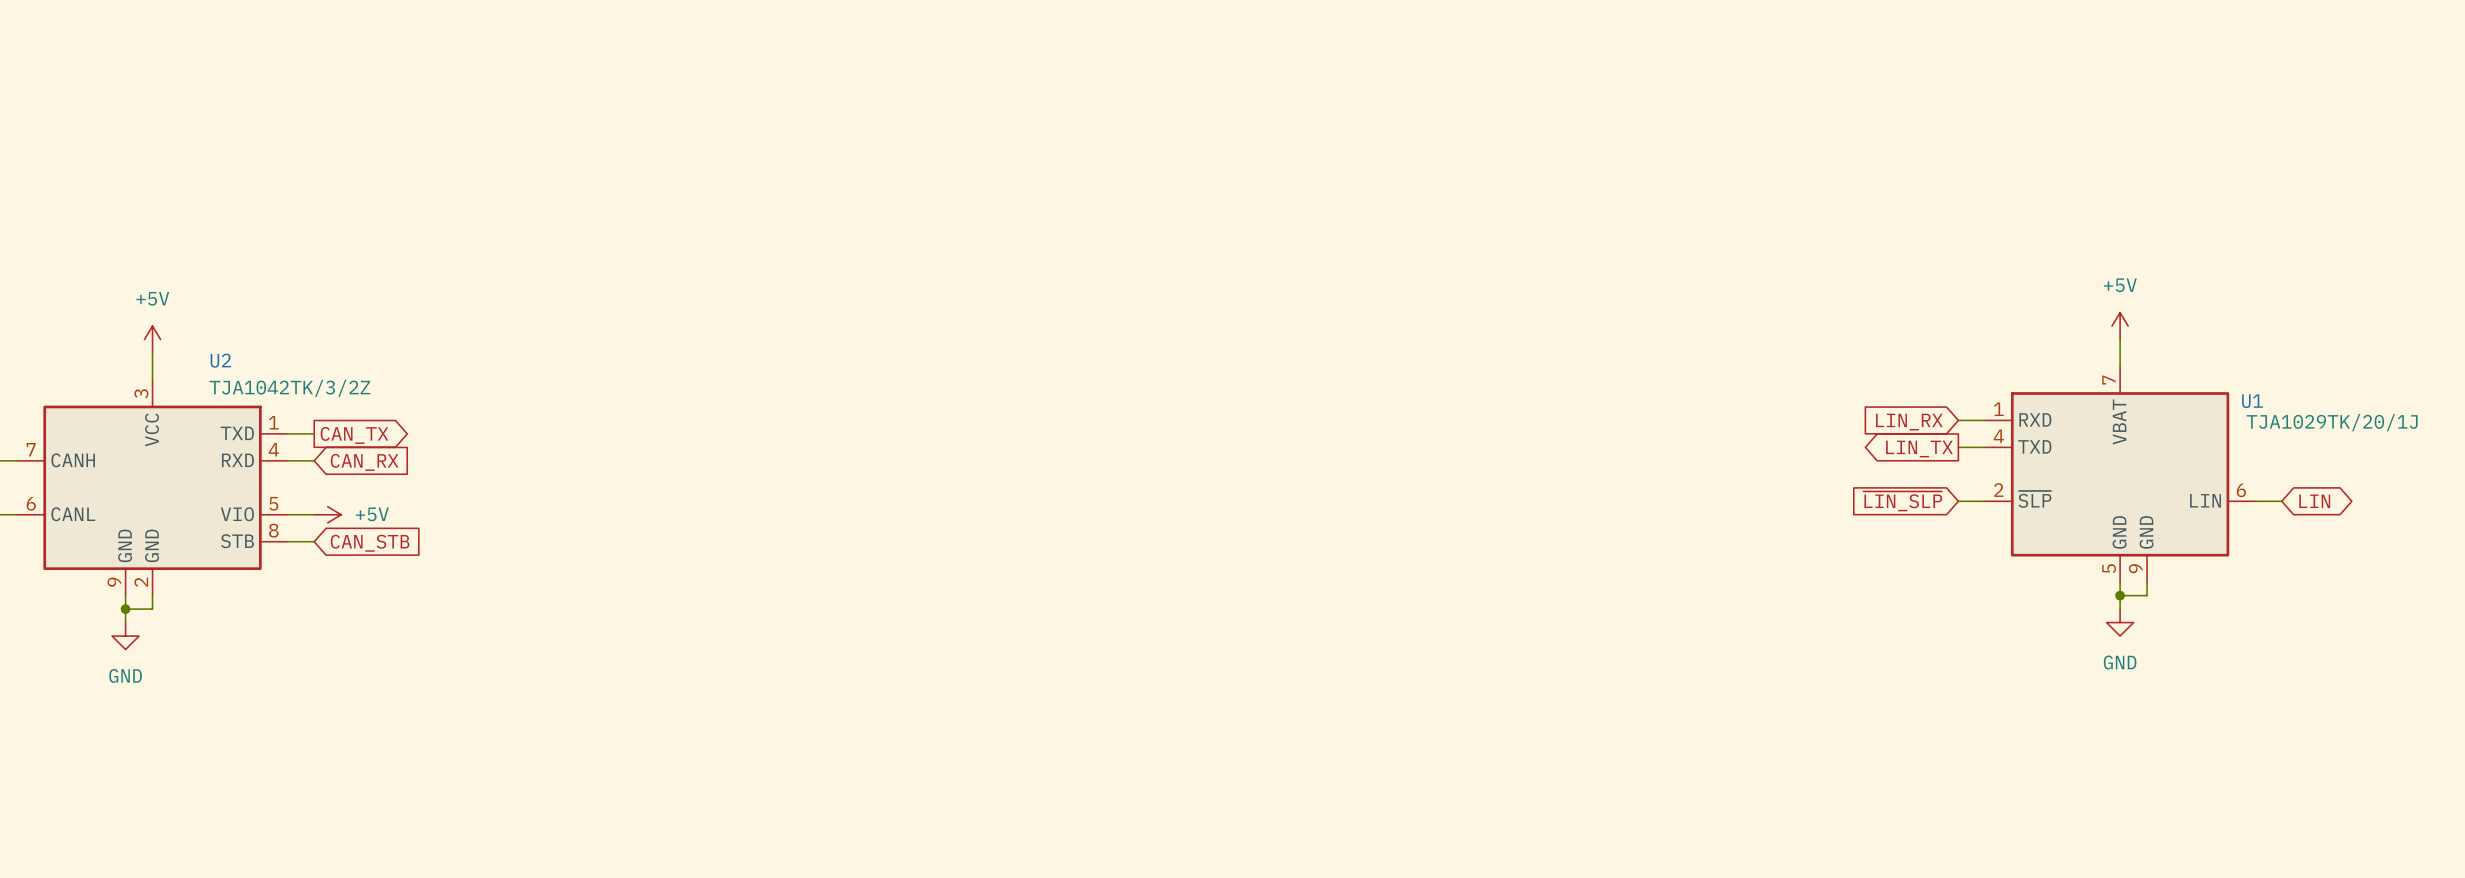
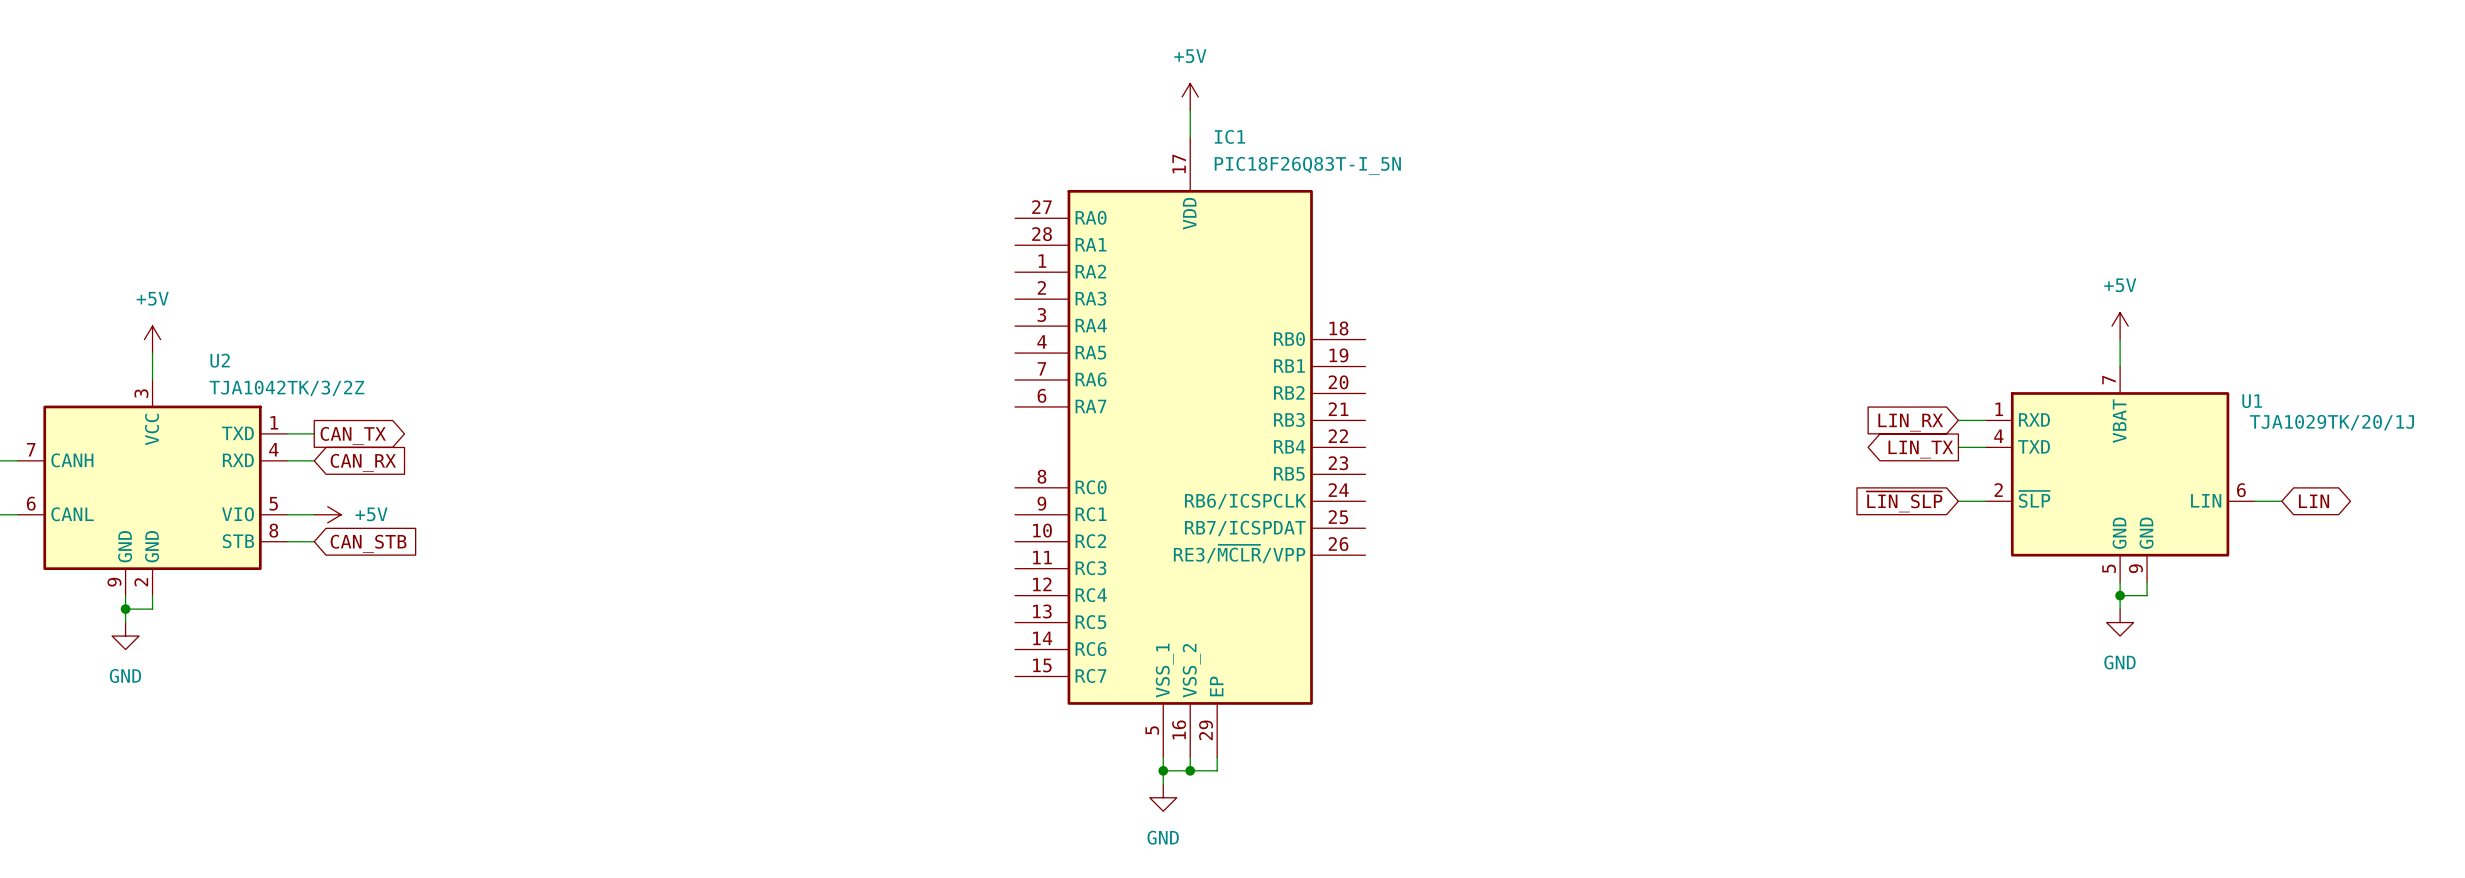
power symbol: none -> +5V (1190, 96)
wire: none -> (1190, 110) (1190, 137)
IC1: none -> PIC18F26Q83T-I_5N (1190, 447)
wire: none -> (1163, 757) (1163, 784)
wire: none -> (1190, 757) (1190, 770)
wire: none -> (1217, 757) (1217, 770) (1163, 770)
junction: none -> (1163, 770)
junction: none -> (1190, 770)
power symbol: none -> GND (1163, 797)

